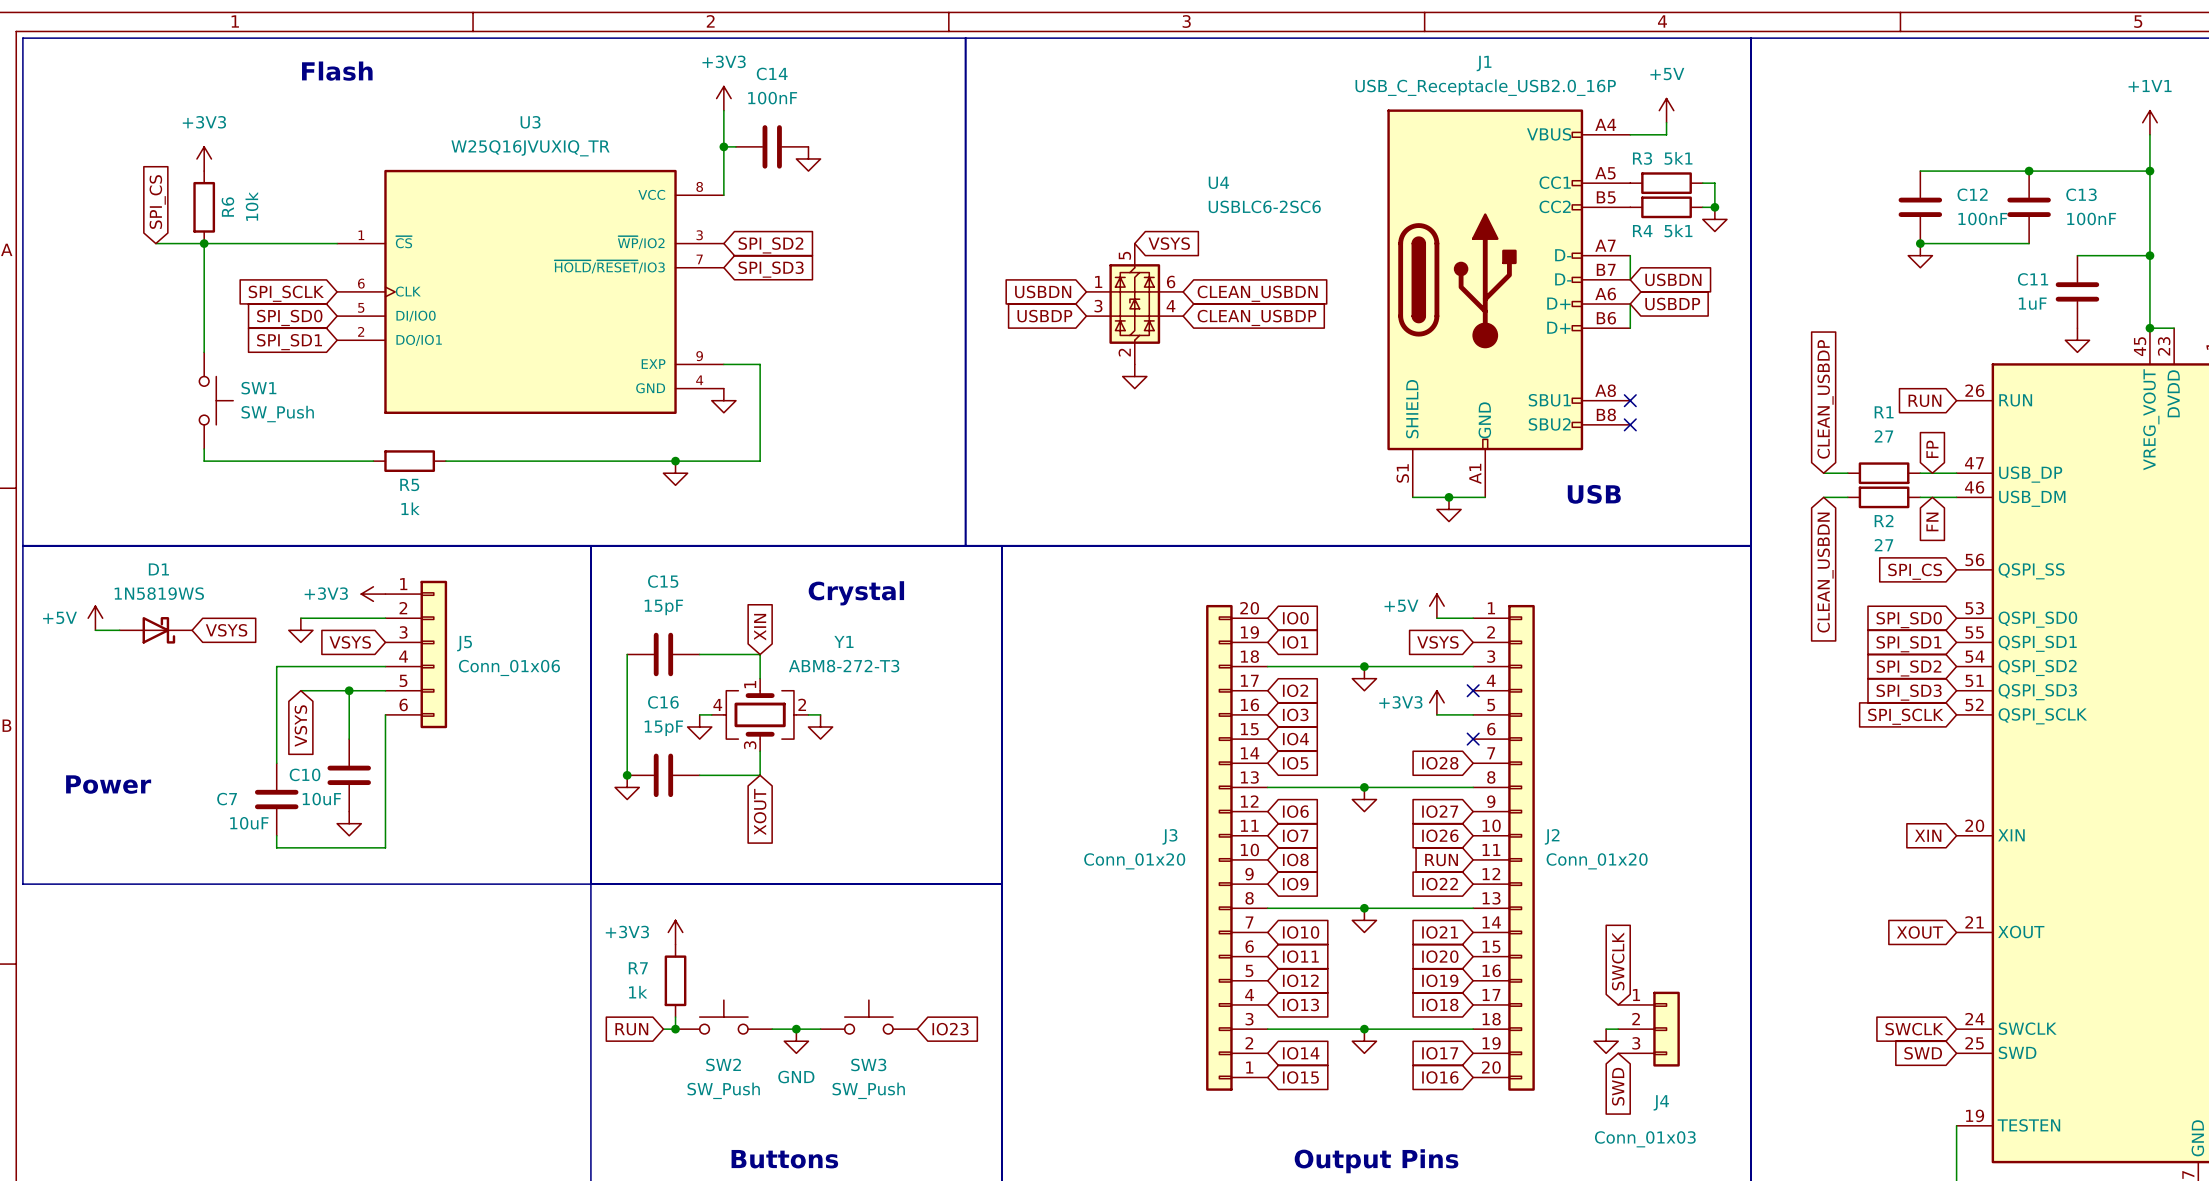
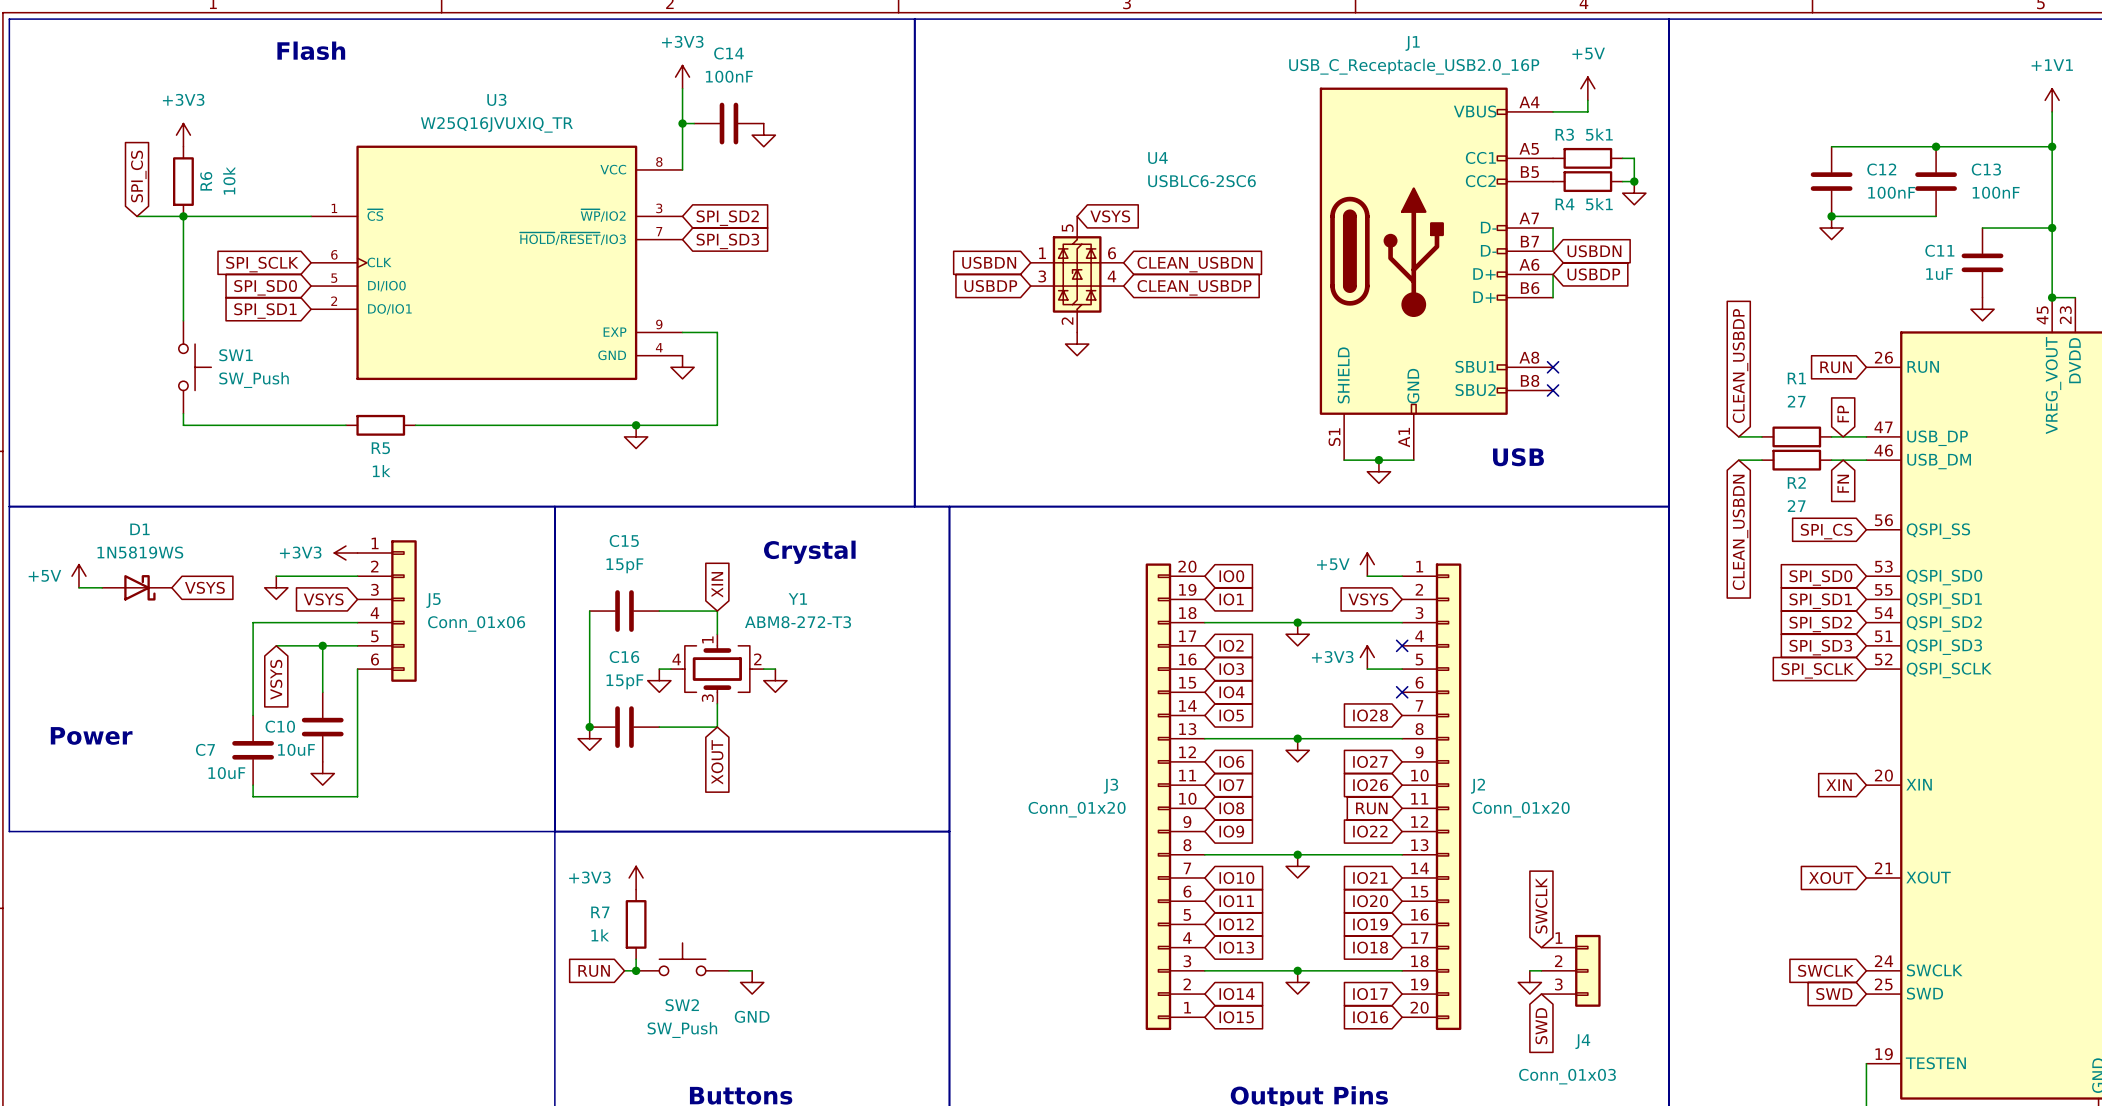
SW3: SW_Push (868, 1017) -> none
wire: (796, 1029) (820, 1029) -> none
junction: (796, 1029) -> none
global label: IO23 (950, 1029) -> none

